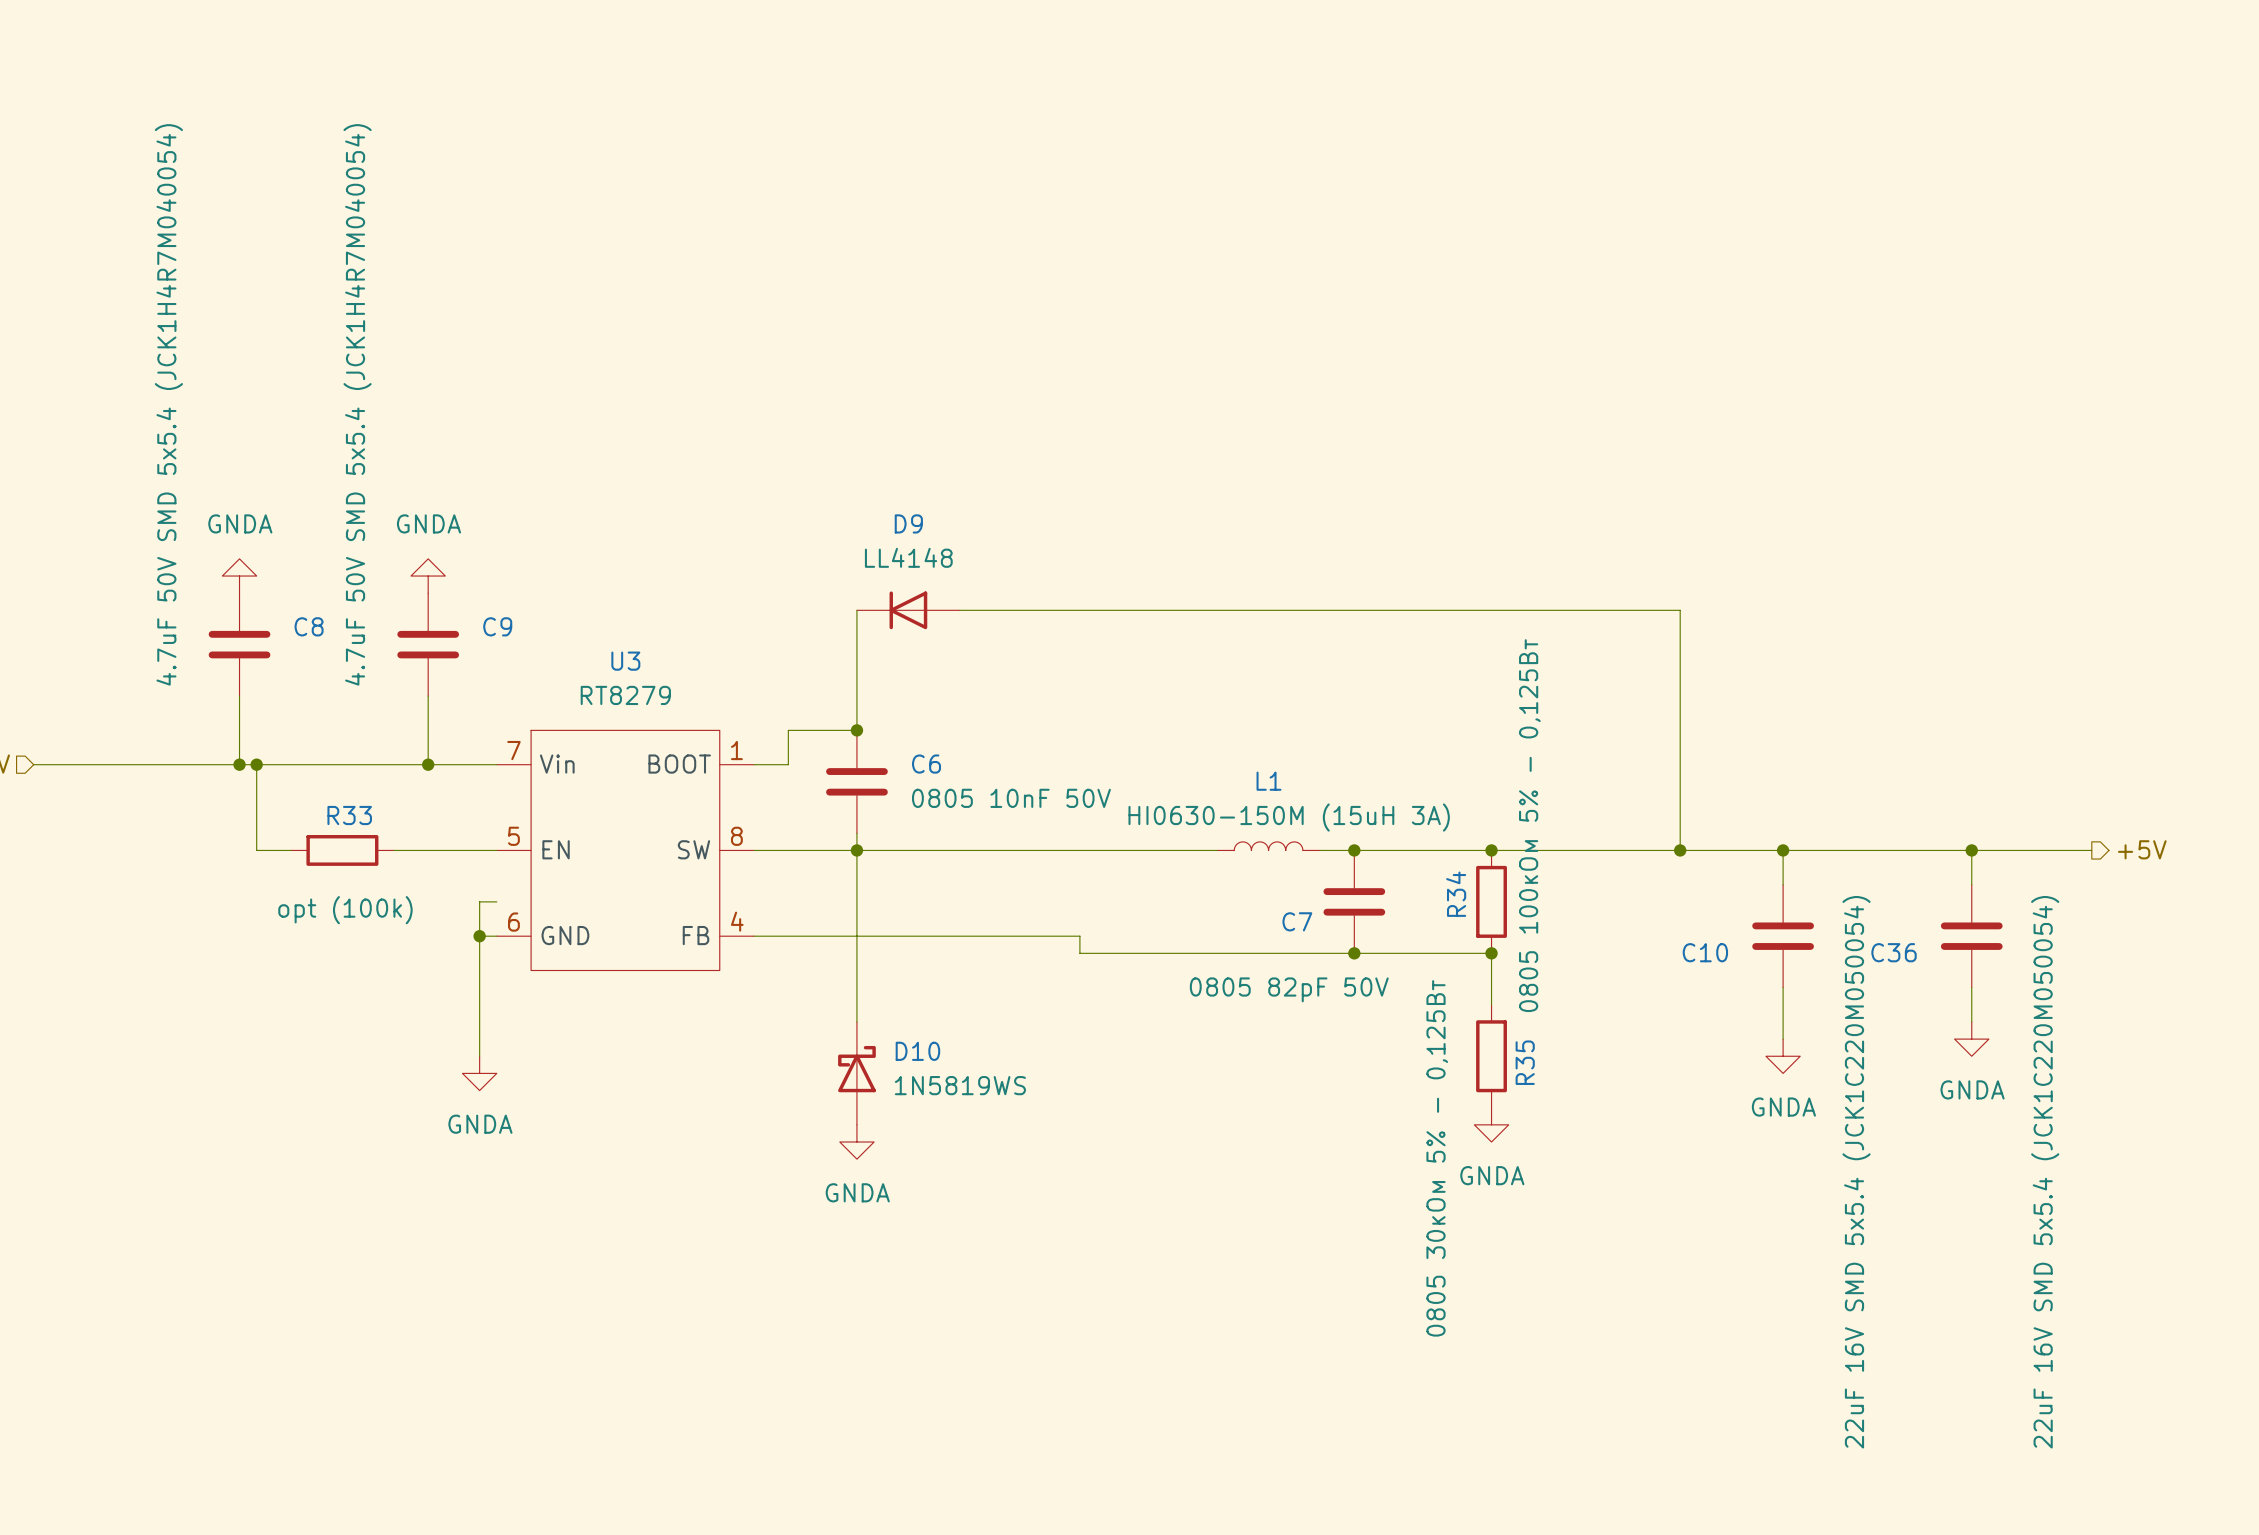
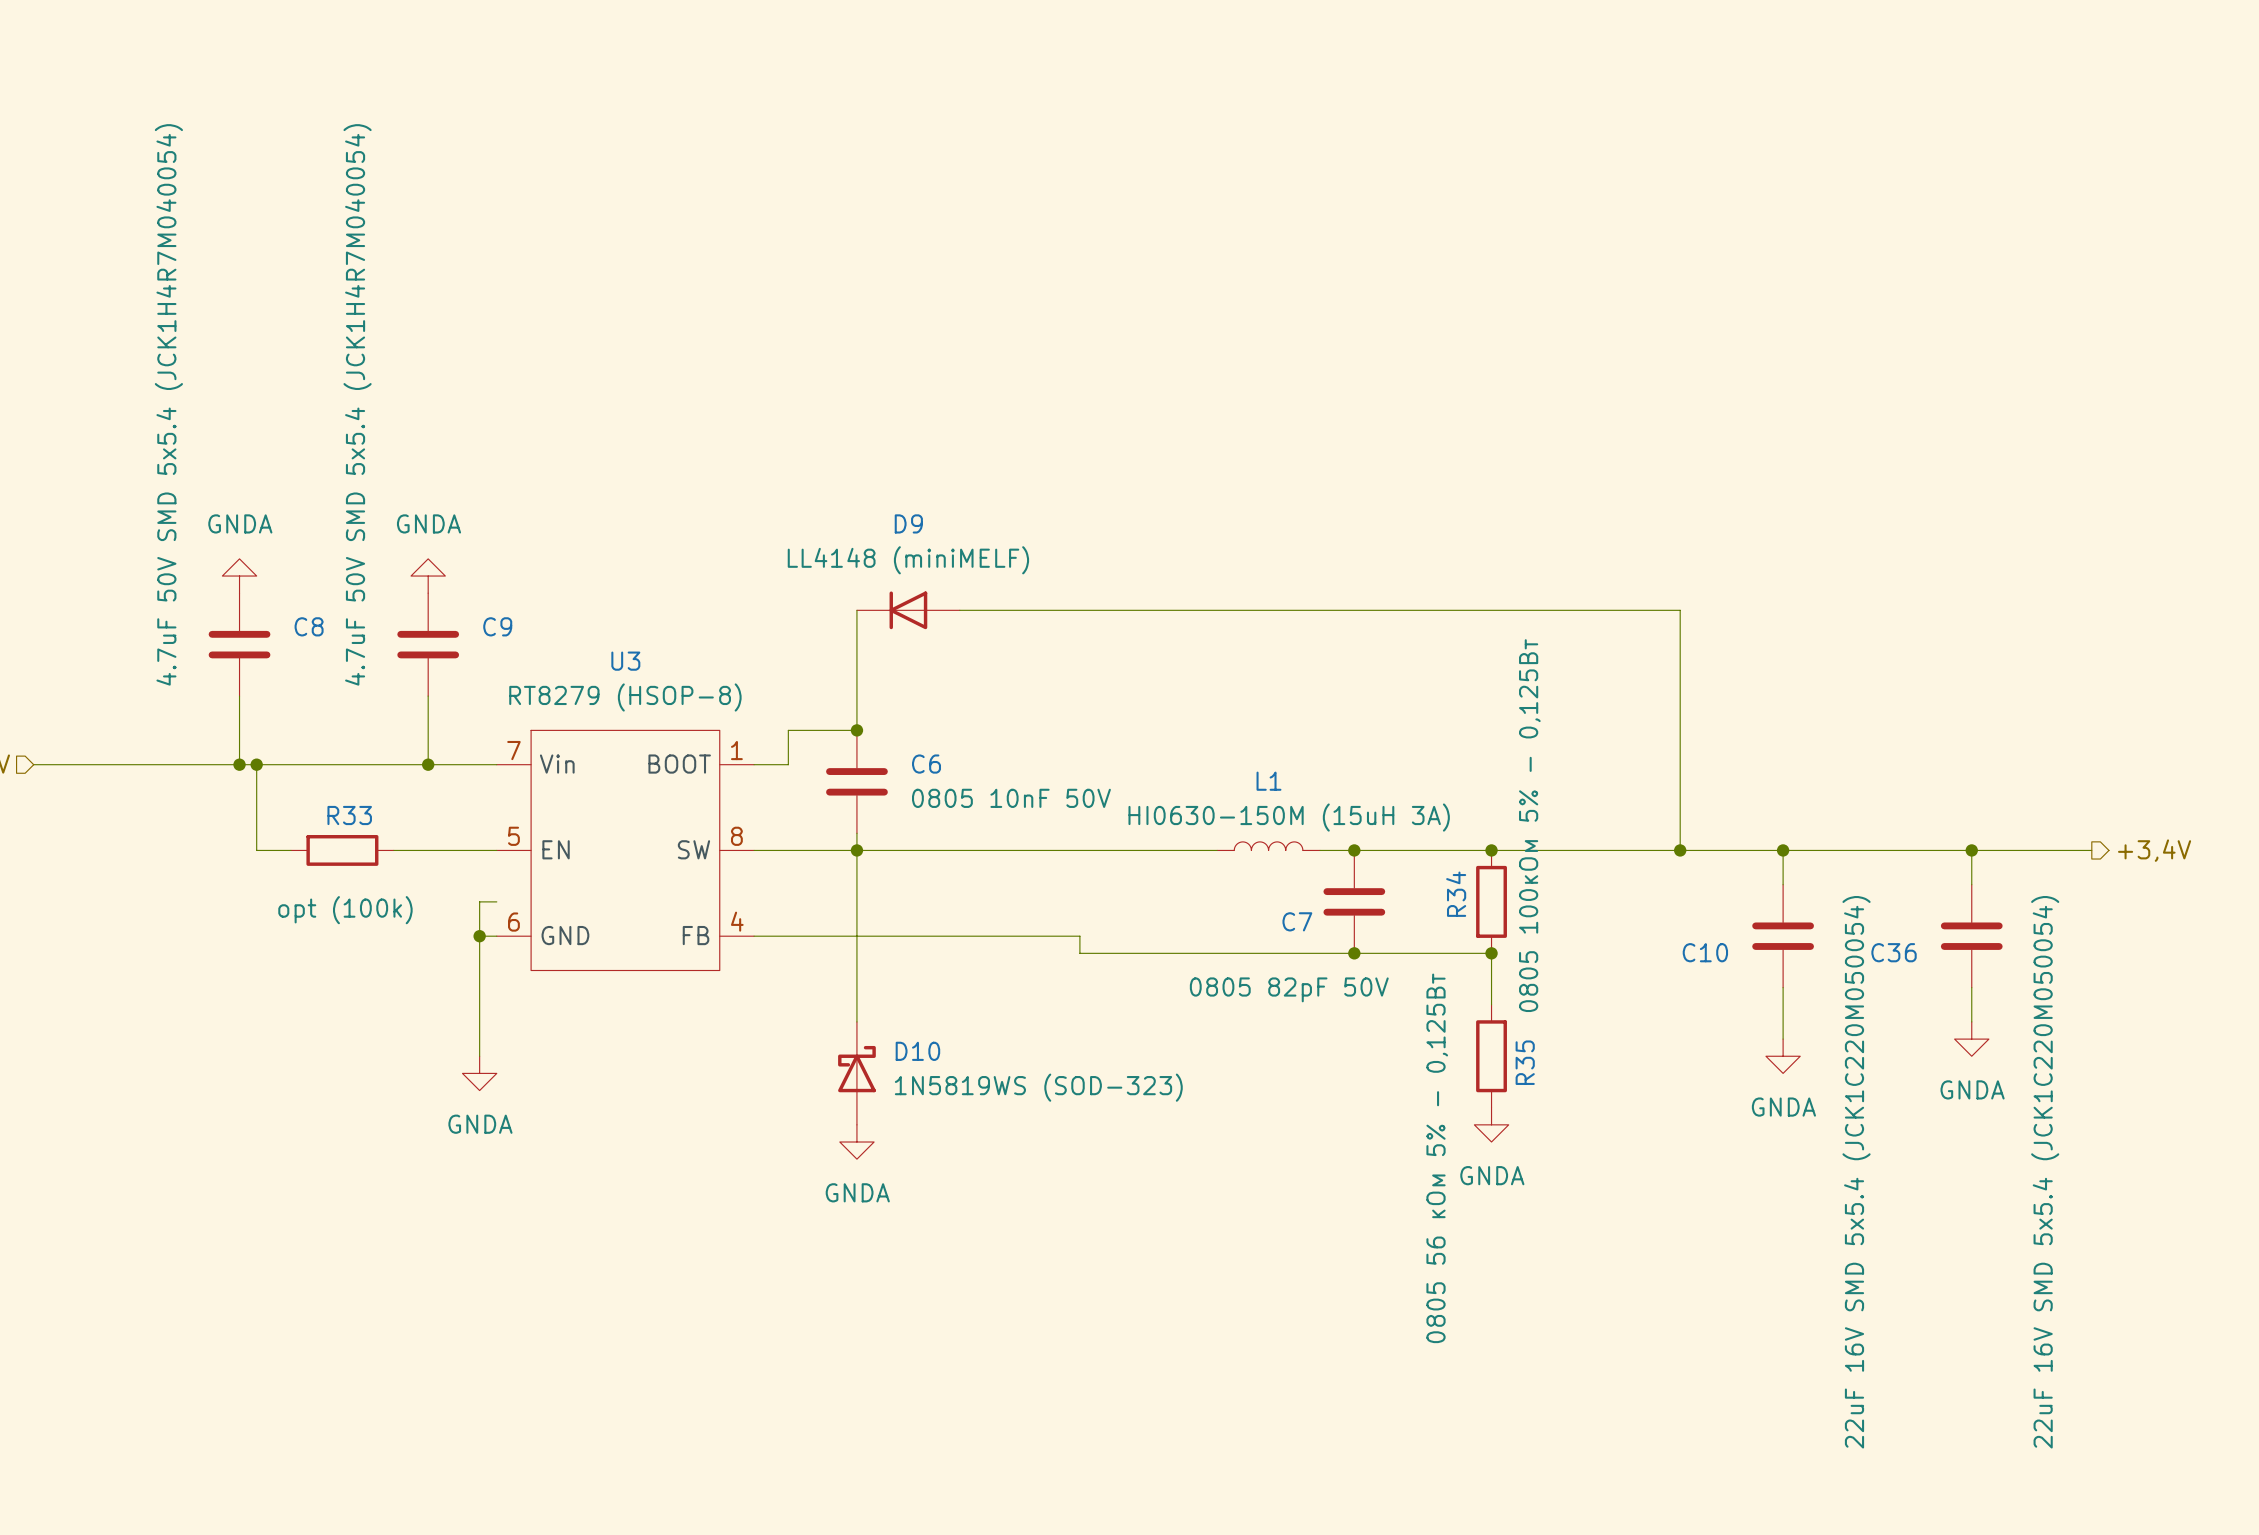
D9 value: LL4148 (908, 557) -> LL4148 (miniMELF) (908, 560)
U3 value: RT8279 (625, 695) -> RT8279 (HSOP-8) (625, 697)
hierarchical label: +5V (2142, 849) -> +3,4V (2154, 850)
D10 value: 1N5819WS (960, 1085) -> 1N5819WS (SOD-323) (1038, 1087)
R35 value: 0805 30кОм 5% - 0,125Вт (1437, 1158) -> 0805 56 кОм 5% - 0,125Вт (1437, 1158)

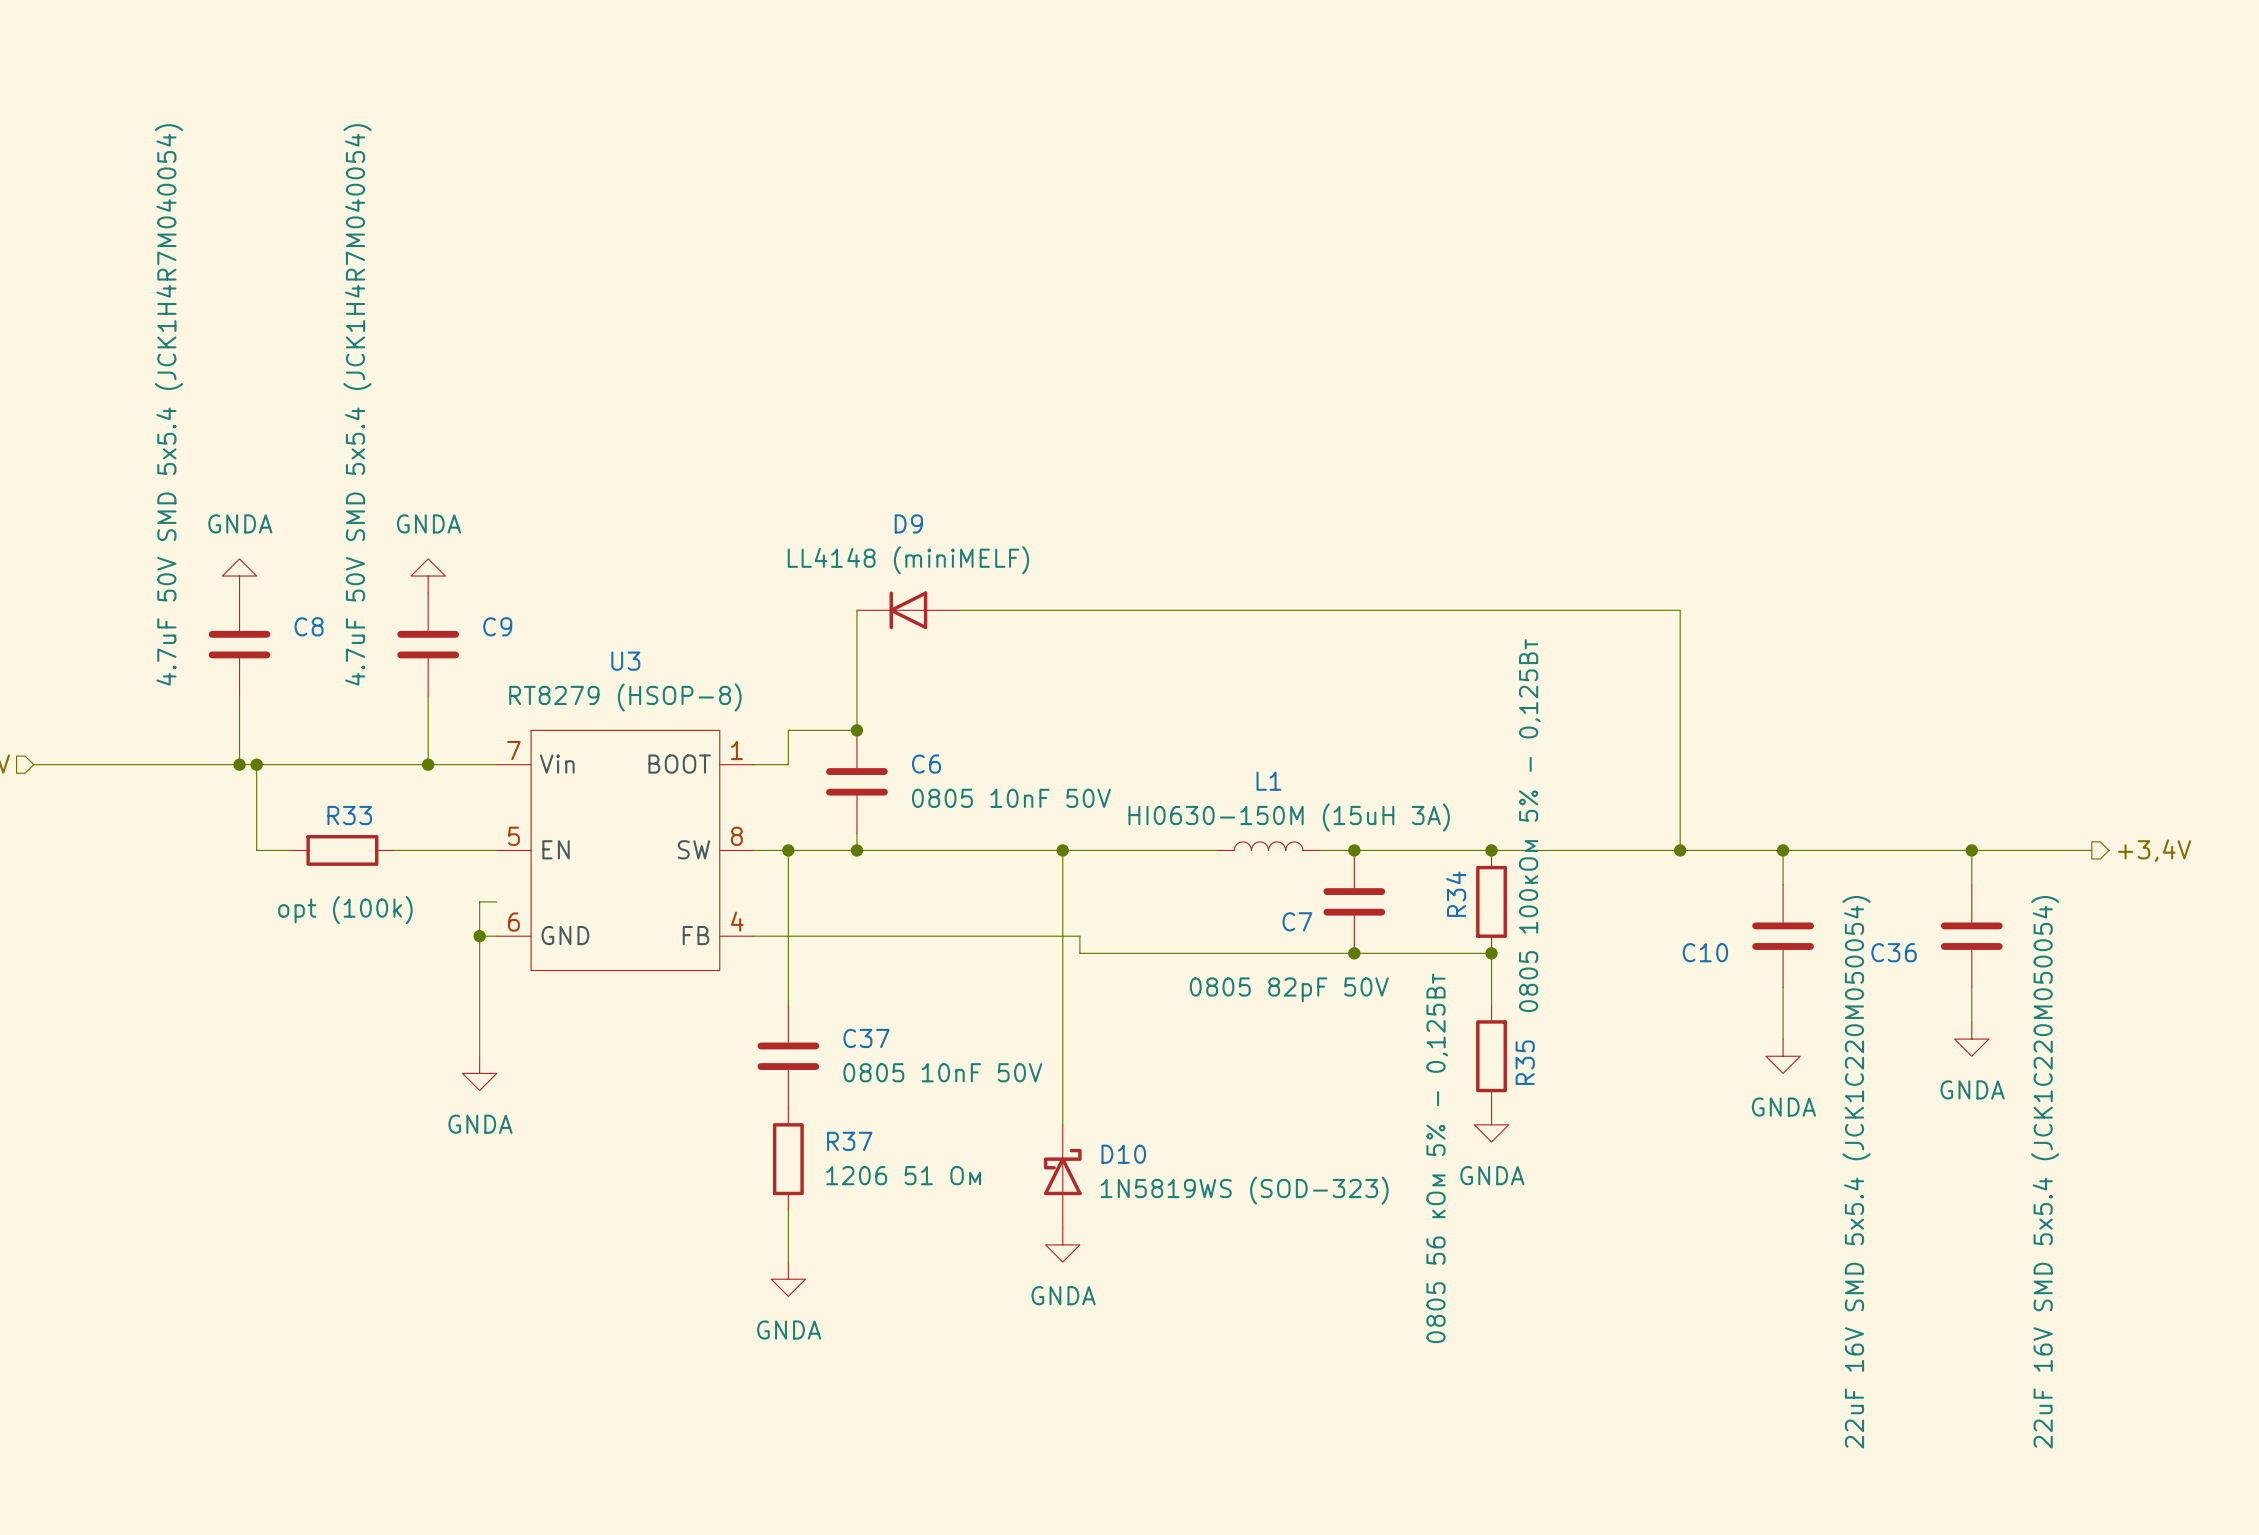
wire: none -> (788, 850) (788, 1004)
junction: none -> (788, 850)
wire: (856, 850) (856, 1021) -> none
wire: none -> (1062, 850) (1062, 1124)
junction: none -> (1062, 850)
C37: none -> 0805 10nF 50V (788, 1056)
D10 position: (856, 1073) -> (1062, 1176)
power symbol: GNDA (856, 1142) -> none
R37: none -> 1206 51 Ом (788, 1159)
wire: none -> (788, 1210) (788, 1262)
power symbol: none -> GNDA (1062, 1244)
power symbol: none -> GNDA (788, 1279)

